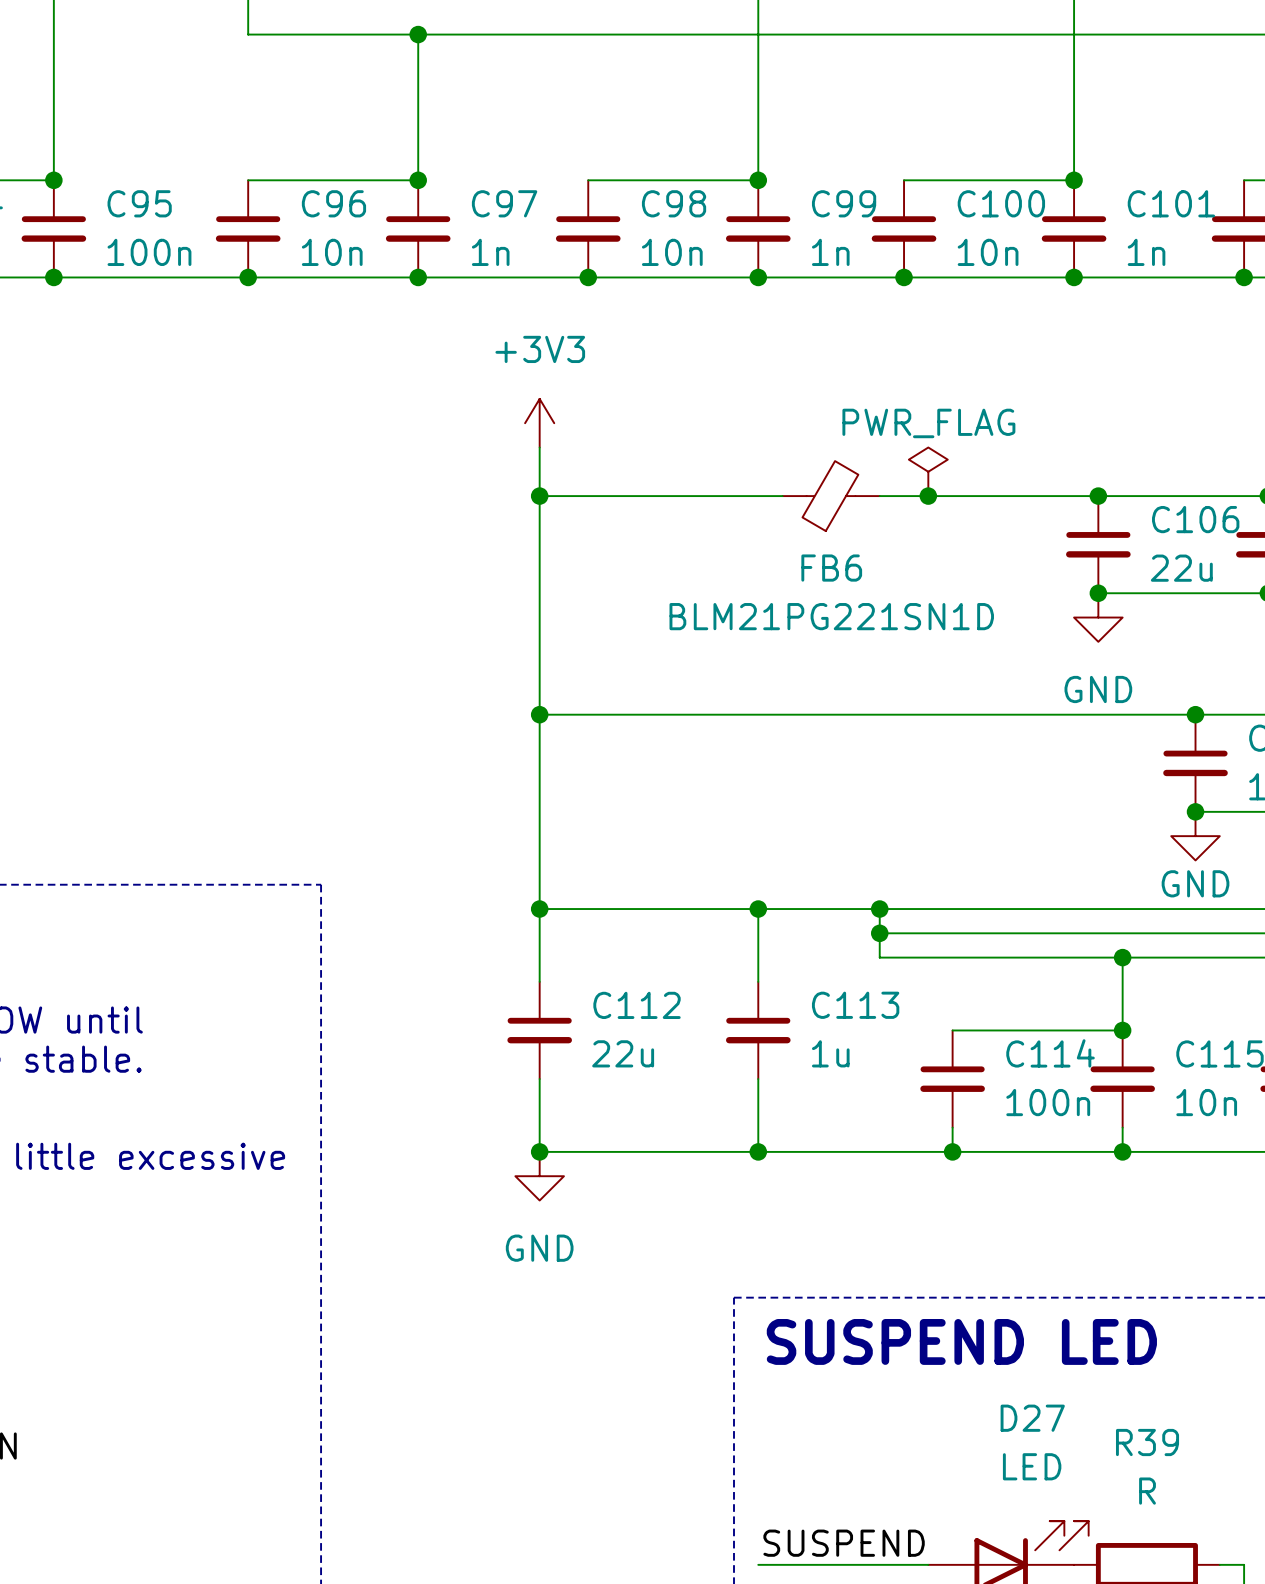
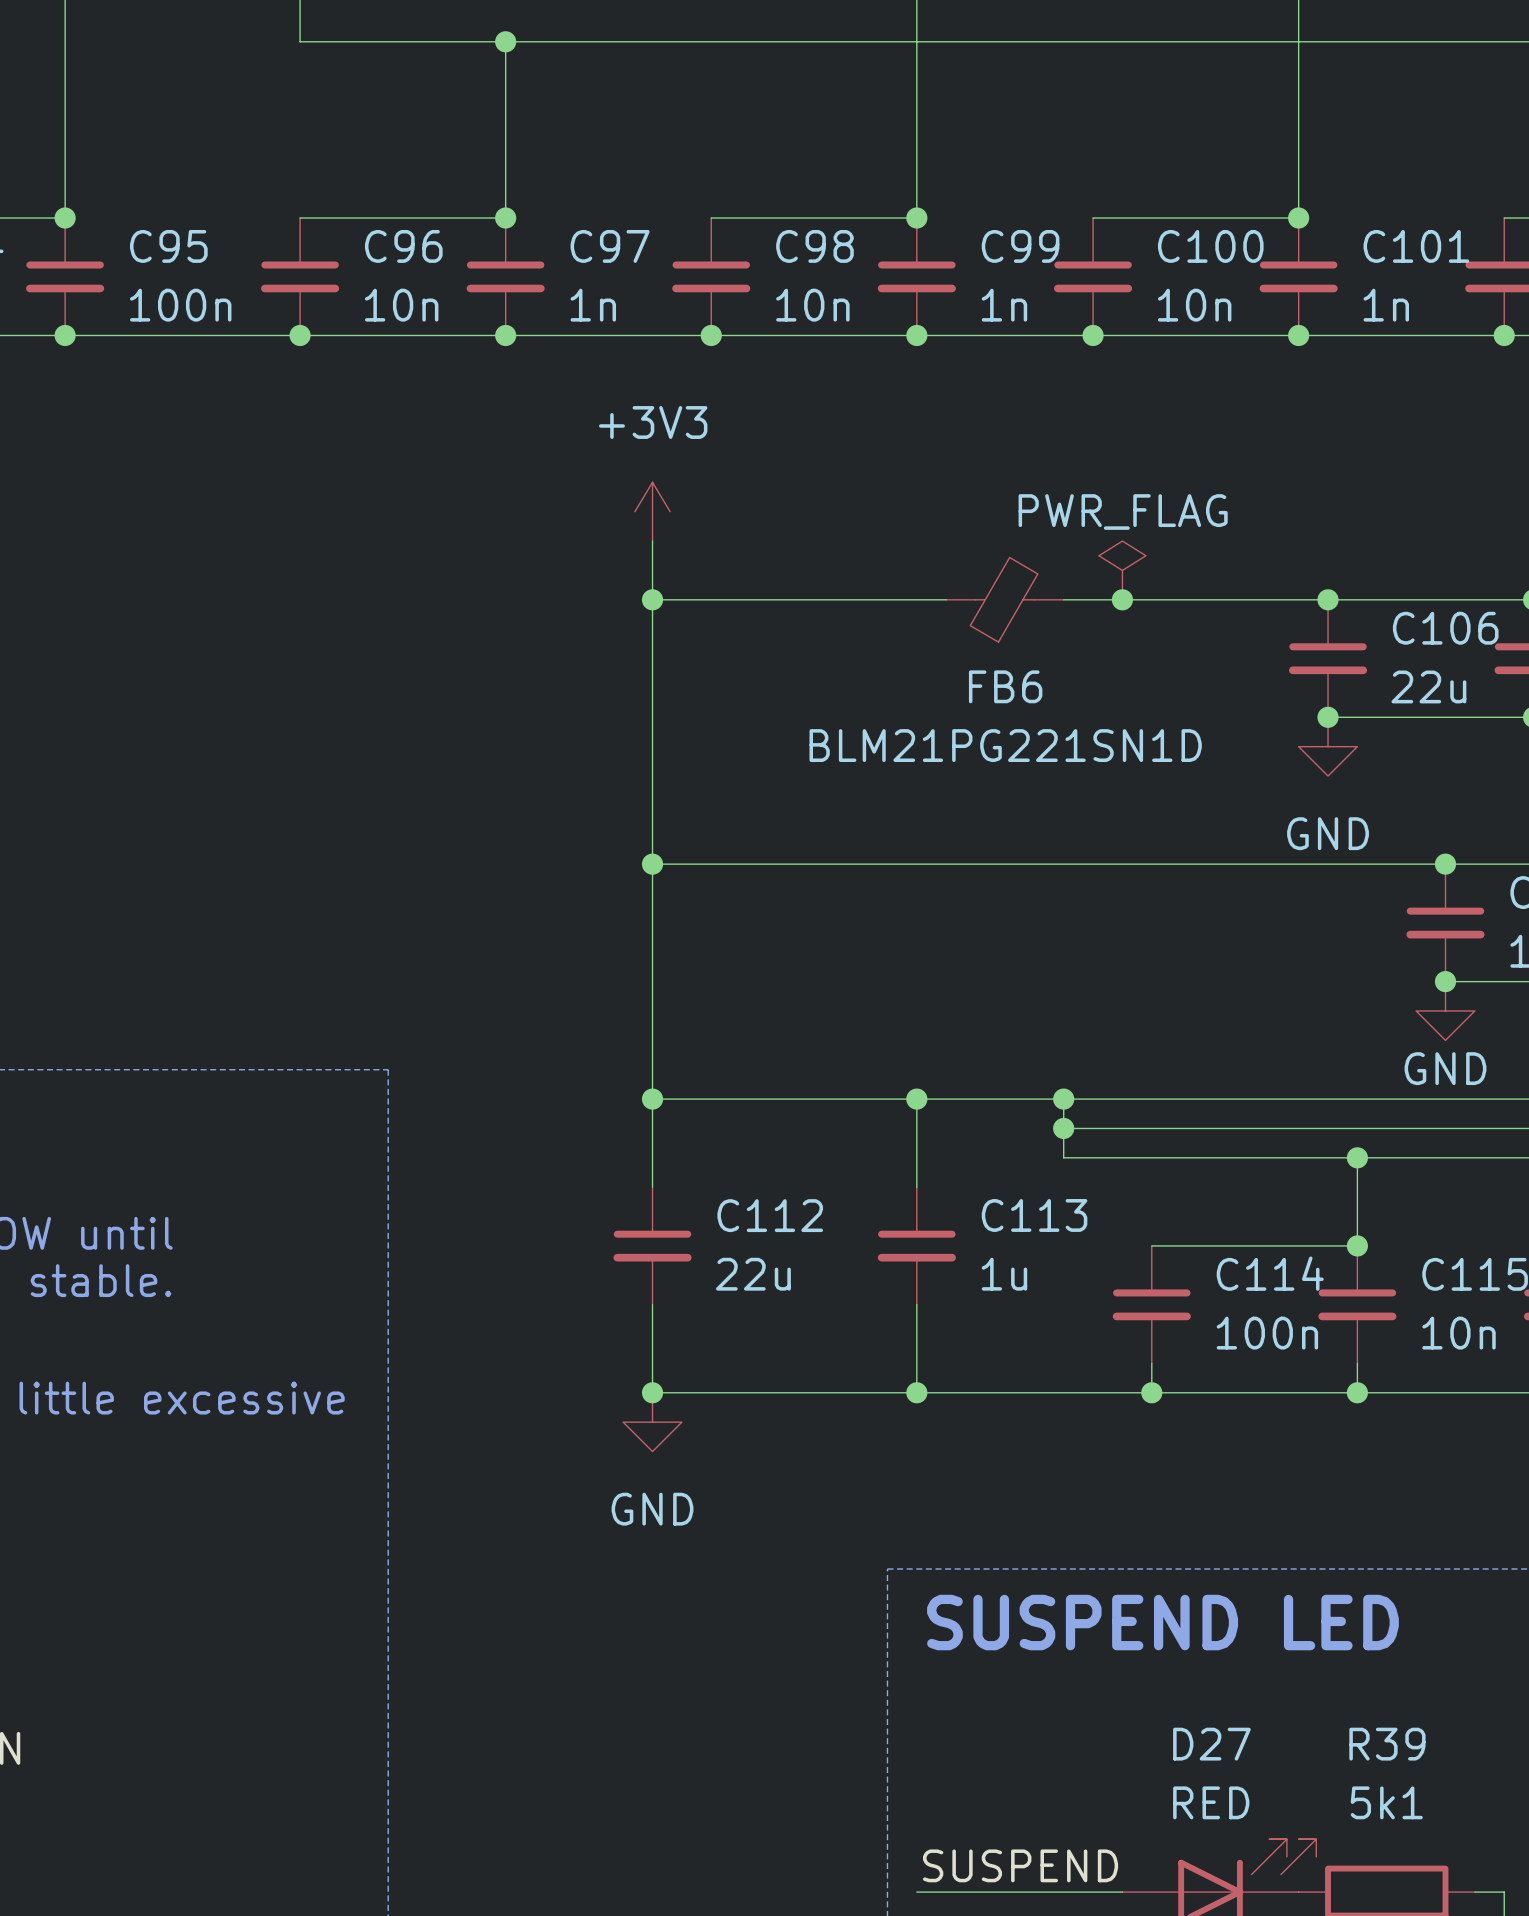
D27 name position: D27 (1032, 1418) -> D27 (1211, 1744)
D27 value: LED (1032, 1466) -> RED (1211, 1802)
R39 value: R (1147, 1491) -> 5k1 (1386, 1802)

